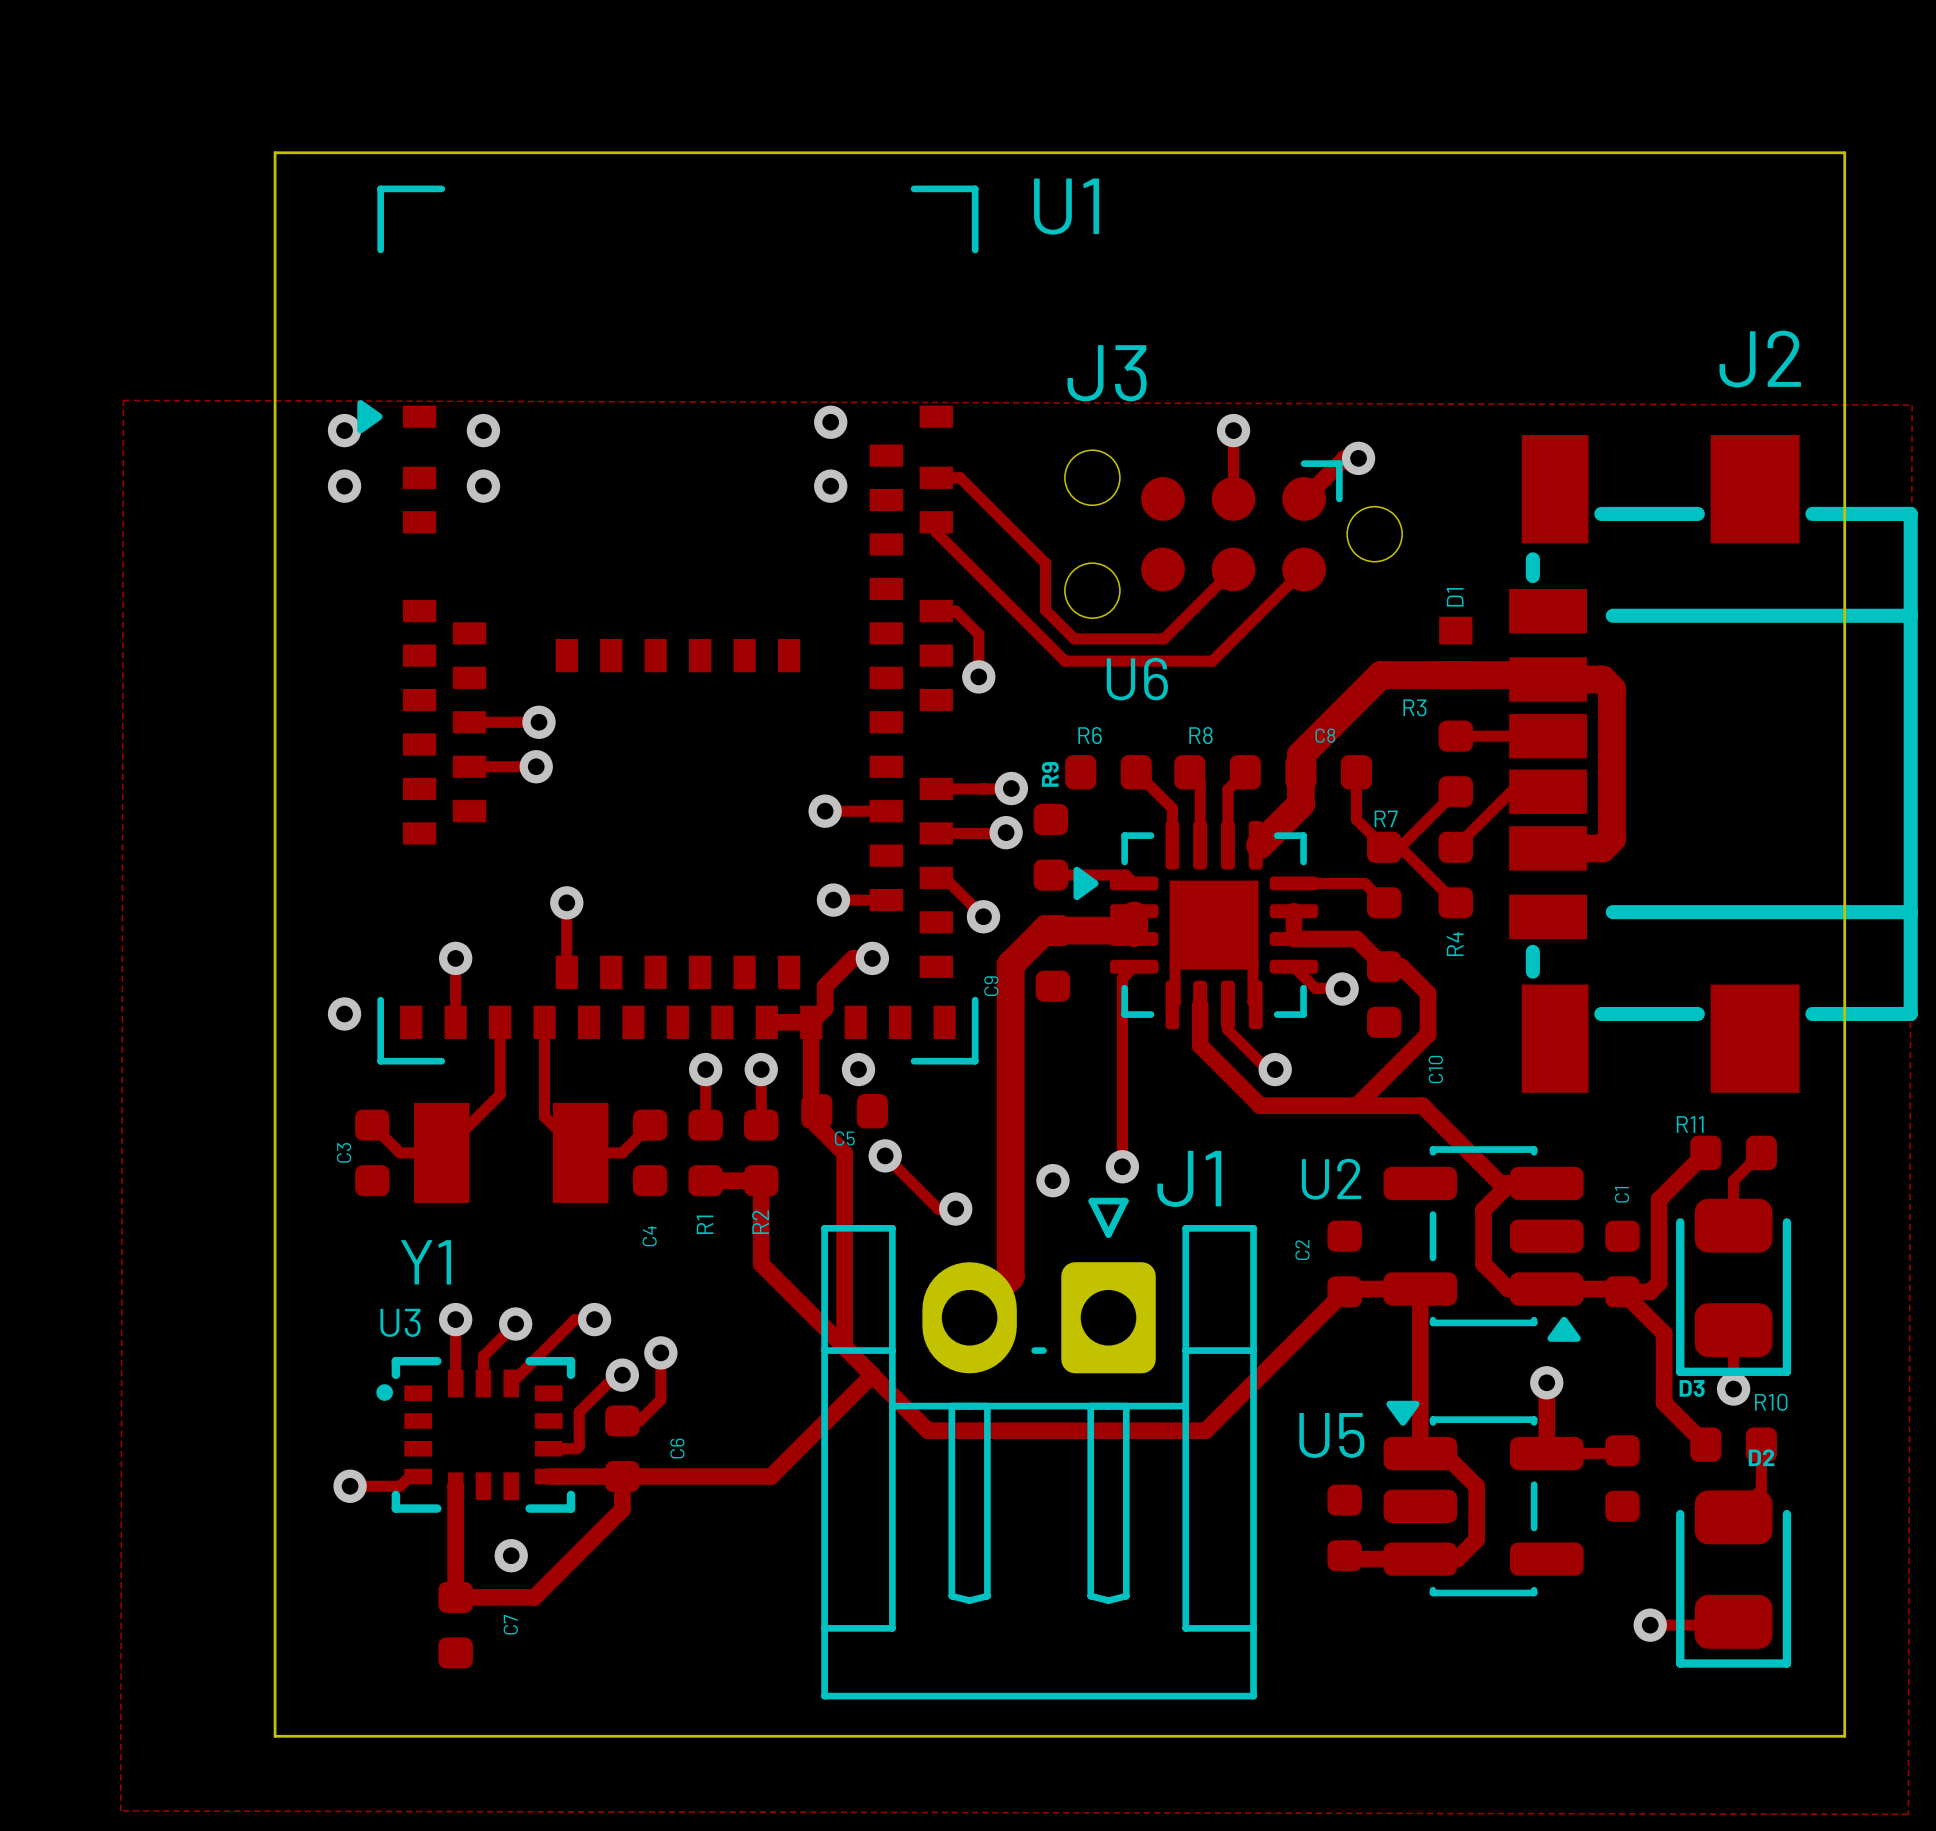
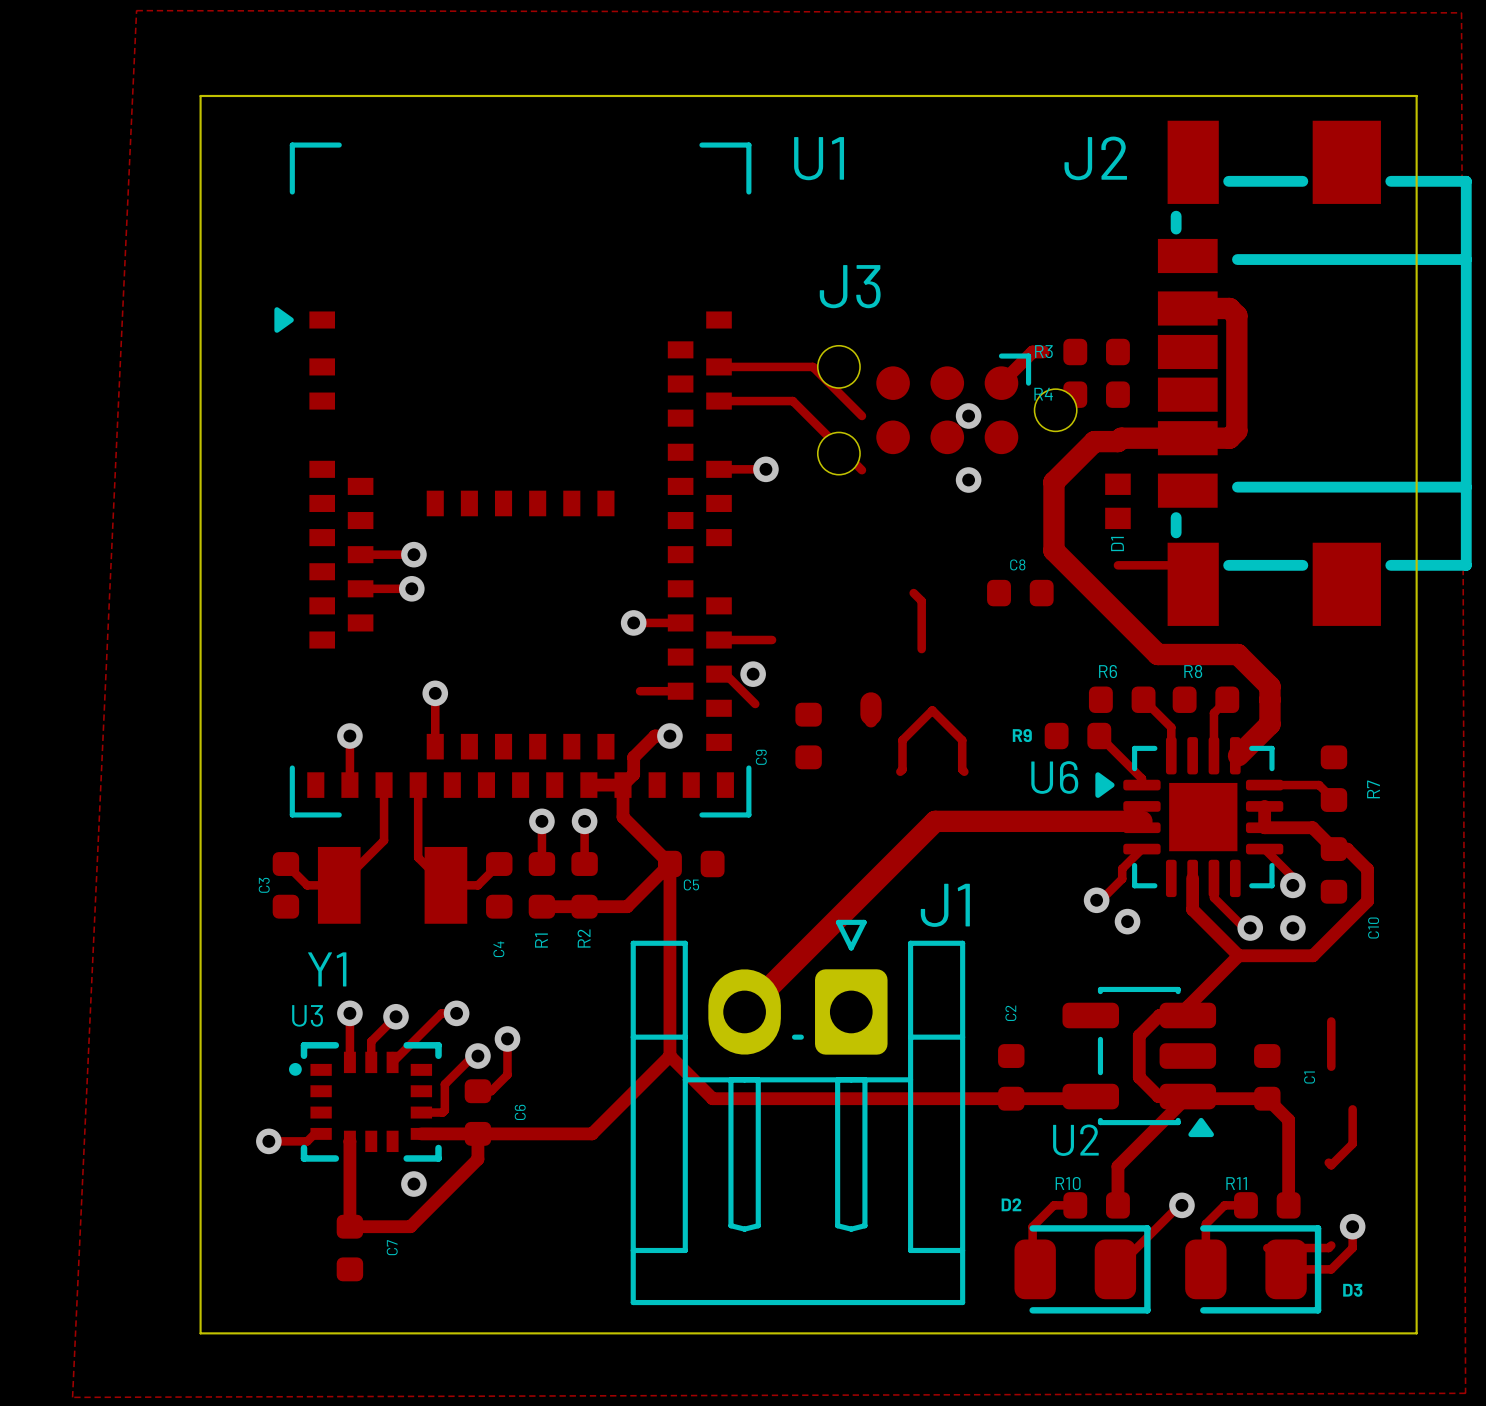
board edge: (1844, 152) (275, 152) (275, 1736) -> (1416, 117) (1416, 95) (200, 95) (200, 1333) (211, 1333)
J2 name position: J2 (1760, 359) -> J2 (1095, 158)
zone outline: (123, 400) (1912, 405) (1908, 1814) (120, 1811) (123, 400) -> (136, 10) (72, 1397) (1465, 1393) (1461, 12) (136, 10)
track: none -> (1187, 308) (1229, 308) (1236, 315) (1236, 430) (1229, 438) (1121, 438) (1117, 441) (1094, 441) (1053, 482) (1053, 550) (1157, 654) (1237, 654) (1269, 686) (1269, 724) (1238, 755)
via: (830, 422) -> none
via: (344, 430) -> none
via: (483, 430) -> none
track: (1233, 430) (1233, 498) -> none
via: (1233, 430) -> none
via: (1358, 458) -> none
track: (960, 477) (1045, 563) (1045, 610) (1074, 638) (1164, 638) (1233, 569) -> (737, 366) (812, 366) (861, 416)
via: (344, 486) -> none
via: (483, 486) -> none
via: (830, 486) -> none
track: (936, 522) (936, 532) (1065, 661) (1212, 661) (1304, 569) -> (719, 401) (792, 401) (861, 470)
via: none -> (968, 416)
D1 name position: D1 (1455, 597) -> D1 (1117, 543)
track: (955, 611) (978, 634) (978, 676) -> (733, 469) (765, 469)
via: none -> (968, 480)
via position: (978, 676) -> (765, 469)
U6 name position: U6 (1137, 679) -> U6 (1054, 777)
R3 rotation: 0° (1455, 763) -> 90° clockwise (1096, 351)
R3 position: (1455, 763) -> (1096, 351)
J2 position: (1713, 763) -> (1314, 373)
R6 position: (1108, 772) -> (1122, 699)
track: (1136, 772) (1172, 808) (1172, 845) -> (1143, 699) (1171, 727) (1171, 755)
R8 position: (1217, 772) -> (1205, 699)
track: (1245, 772) (1227, 789) (1227, 845) -> (1227, 699) (1213, 713) (1213, 755)
track: (1356, 772) (1356, 819) (1384, 847) (1400, 847) -> none
R9 name position: R9 (1050, 774) -> R9 (1022, 735)
track: (936, 788) (1010, 788) -> none
via: (1011, 788) -> none
track: (1455, 791) (1400, 847) -> none
track: (1548, 791) (1511, 791) (1455, 847) -> none
R7 name rotation: 0° (1386, 818) -> 90° counterclockwise (1373, 789)
R7 name position: R7 (1386, 818) -> R7 (1373, 789)
via: (1006, 832) -> none
track: (1259, 845) (1300, 804) (1300, 755) (1380, 675) (1543, 675) (1548, 679) (1602, 679) (1611, 688) (1611, 838) (1602, 848) (1548, 848) -> none
R9 rotation: 0° (1050, 847) -> 90° clockwise (1077, 736)
R9 position: (1050, 847) -> (1077, 736)
track: (1400, 847) (1455, 902) -> none
track: (1050, 875) (1125, 875) (1134, 883) -> none
R7 position: (1384, 875) -> (1333, 778)
R4 rotation: 0° (1455, 875) -> 90° clockwise (1096, 394)
R4 position: (1455, 875) -> (1096, 394)
via: none -> (753, 674)
track: (1293, 883) (1364, 883) (1384, 902) -> (1264, 785) (1319, 785) (1333, 800)
via: (833, 900) -> none
track: (1293, 911) (1293, 938) (1356, 938) (1384, 966) (1401, 966) (1428, 993) (1428, 1034) (1356, 1105) -> none
via: (983, 916) -> none
U6 position: (1195, 925) -> (1189, 817)
track: (1134, 930) (1044, 930) (1010, 964) (1010, 1276) -> (973, 821) (935, 821) (776, 980)
track: none -> (1099, 736) (1141, 778) (1141, 785)
track: (1134, 966) (1122, 978) (1122, 1166) -> none
track: (1293, 966) (1315, 988) (1341, 988) -> none
via: (1342, 989) -> none
C10 position: (1384, 994) -> (1333, 870)
track: (1200, 1004) (1200, 1045) (1260, 1105) (1422, 1105) (1500, 1183) (1546, 1183) -> none
track: (1227, 1004) (1227, 1030) (1267, 1069) -> none
via: (344, 1013) -> none
track: none -> (1264, 806) (1264, 827) (1312, 827) (1333, 849) (1347, 849) (1367, 869) (1367, 901) (1312, 955) (1238, 955)
track: (811, 1063) (811, 1105) (816, 1111) (816, 1125) (844, 1153) (844, 1347) -> (623, 817) (669, 864)
via: (858, 1069) -> none
track: none -> (979, 821) (1141, 821)
via: (1275, 1069) -> none
track: none -> (1141, 849) (1122, 868) (1122, 878) (1100, 900) (1096, 900)
track: none -> (1264, 849) (1292, 877) (1292, 885)
C5 position: (844, 1111) -> (691, 864)
R11 name position: R11 (1690, 1124) -> R11 (1236, 1183)
track: none -> (669, 864) (627, 906) (584, 906)
track: none -> (1192, 878) (1192, 909) (1238, 955)
track: none -> (1213, 878) (1213, 897) (1244, 928) (1250, 928)
via: none -> (1292, 885)
track: (1705, 1152) (1659, 1199) (1659, 1282) (1650, 1291) (1622, 1291) -> none
R11 position: (1733, 1152) -> (1267, 1205)
track: (1761, 1152) (1733, 1180) (1733, 1225) -> none
track: (885, 1155) (938, 1209) (955, 1209) -> none
via: (885, 1155) -> none
via: (1122, 1166) -> none
via: none -> (1096, 900)
J1 name position: J1 (1189, 1178) -> J1 (945, 905)
U2 name position: U2 (1331, 1179) -> U2 (1075, 1140)
track: (761, 1180) (761, 1264) (872, 1375) -> (669, 864) (669, 1056)
via: (1052, 1180) -> none
track: (1509, 1183) (1483, 1209) (1483, 1264) (1508, 1289) (1619, 1289) (1664, 1333) (1664, 1402) (1705, 1444) -> none
C1 name position: C1 (1621, 1194) -> C1 (1309, 1077)
via: none -> (1127, 921)
via: none -> (1250, 928)
via: none -> (1292, 928)
via: (955, 1209) -> none
U2 position: (1483, 1244) -> (1139, 1062)
track: none -> (1238, 955) (1187, 1006) (1187, 1015) (1159, 1015) (1139, 1035) (1139, 1077) (1158, 1096) (1187, 1096)
C2 name position: C2 (1302, 1249) -> C2 (1010, 1013)
C2 position: (1344, 1264) -> (1011, 1077)
C1 position: (1622, 1264) -> (1267, 1077)
D3 rotation: 0° (1733, 1287) -> 90° counterclockwise (1253, 1269)
D3 position: (1733, 1287) -> (1253, 1269)
track: (1420, 1289) (1347, 1289) (1205, 1430) -> (1090, 1096) (1088, 1098) (925, 1098)
track: (1420, 1289) (1420, 1453) (1443, 1453) (1476, 1486) (1476, 1539) (1457, 1559) (1348, 1559) (1344, 1555) -> none
track: (1546, 1382) (1546, 1453) (1619, 1453) -> none
via: (1546, 1382) -> none
via: (1733, 1389) -> none
R10 name position: R10 (1771, 1402) -> R10 (1068, 1183)
track: none -> (1187, 1096) (1117, 1166) (1117, 1205)
track: none -> (1187, 1096) (1189, 1098) (1267, 1098) (1288, 1120) (1288, 1205)
R10 position: (1733, 1444) -> (1096, 1205)
part: (1622, 1478) -> none
U5: (1483, 1498) -> none
part: (1344, 1527) -> none
via position: (511, 1555) -> (413, 1184)
track: none -> (1075, 1205) (1053, 1205) (1032, 1226) (1032, 1266) (1035, 1269)
track: none -> (1181, 1205) (1179, 1205) (1115, 1269)
via: none -> (1181, 1205)
track: none -> (1245, 1205) (1224, 1205) (1205, 1224) (1205, 1269)
D2 rotation: 0° (1733, 1579) -> 90° counterclockwise (1082, 1269)
D2 position: (1733, 1579) -> (1082, 1269)
track: none -> (1352, 1226) (1352, 1248) (1331, 1269) (1286, 1269)
via: none -> (1352, 1226)
via: (1650, 1625) -> none

